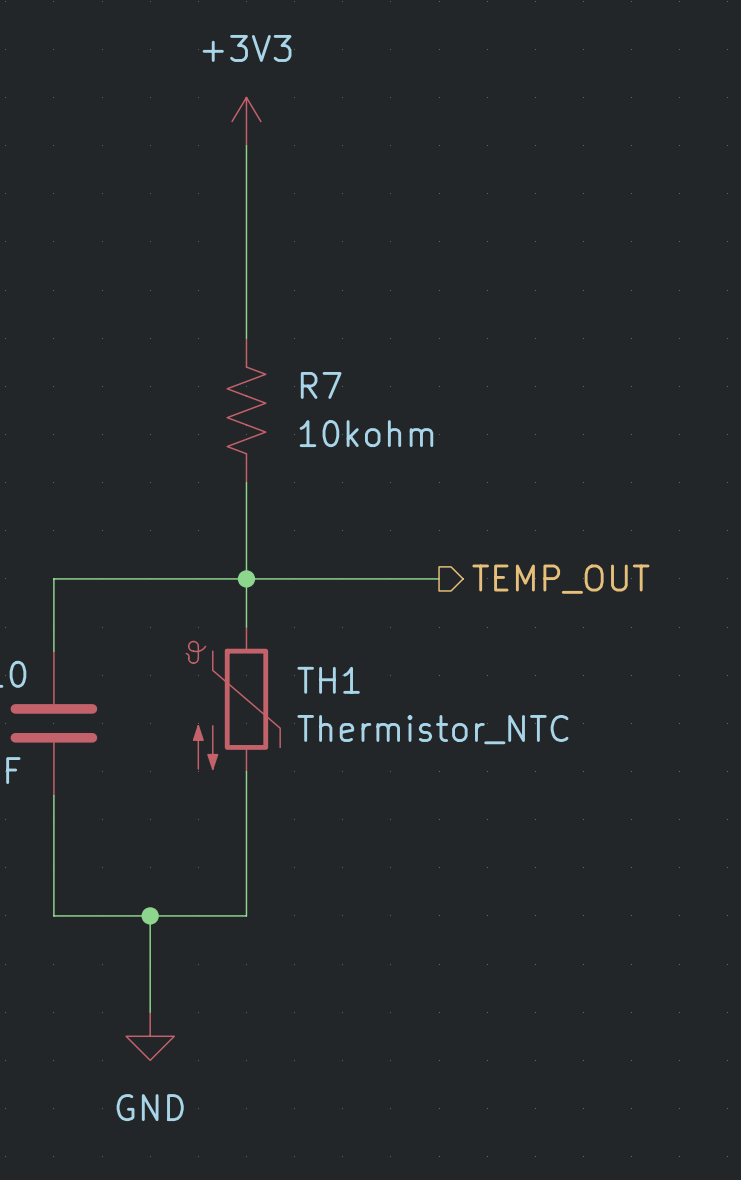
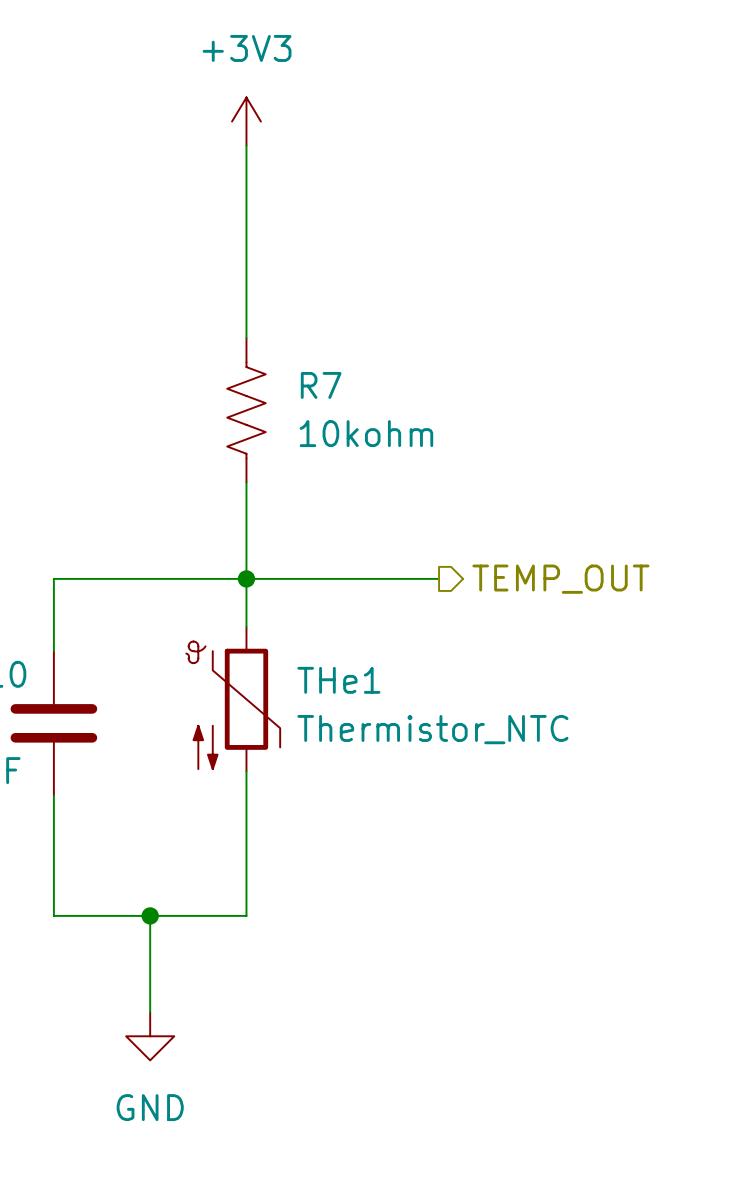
TH1 name: TH1 (328, 680) -> THe1 (338, 680)

